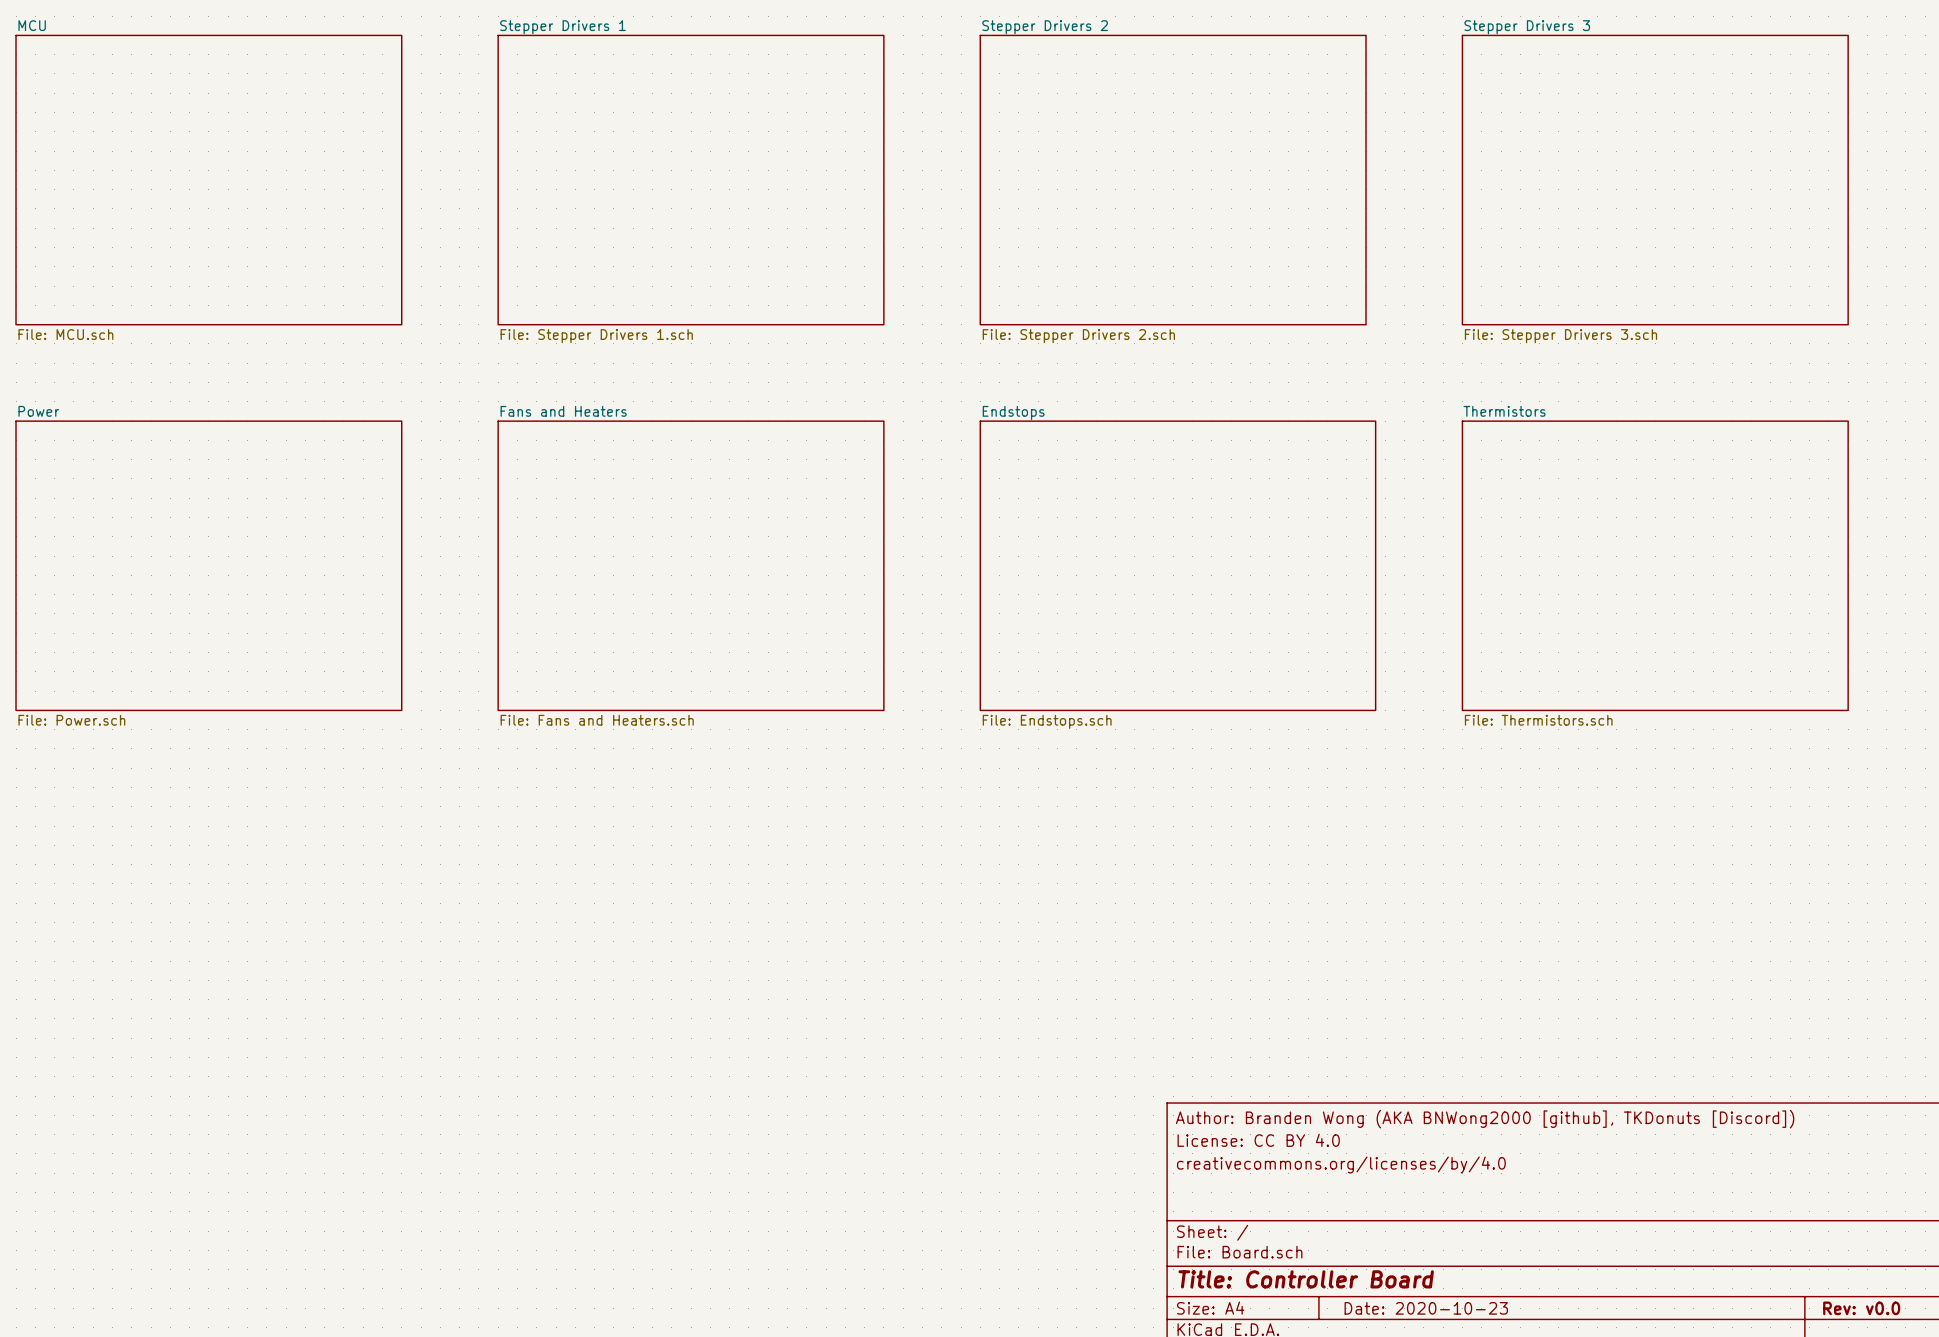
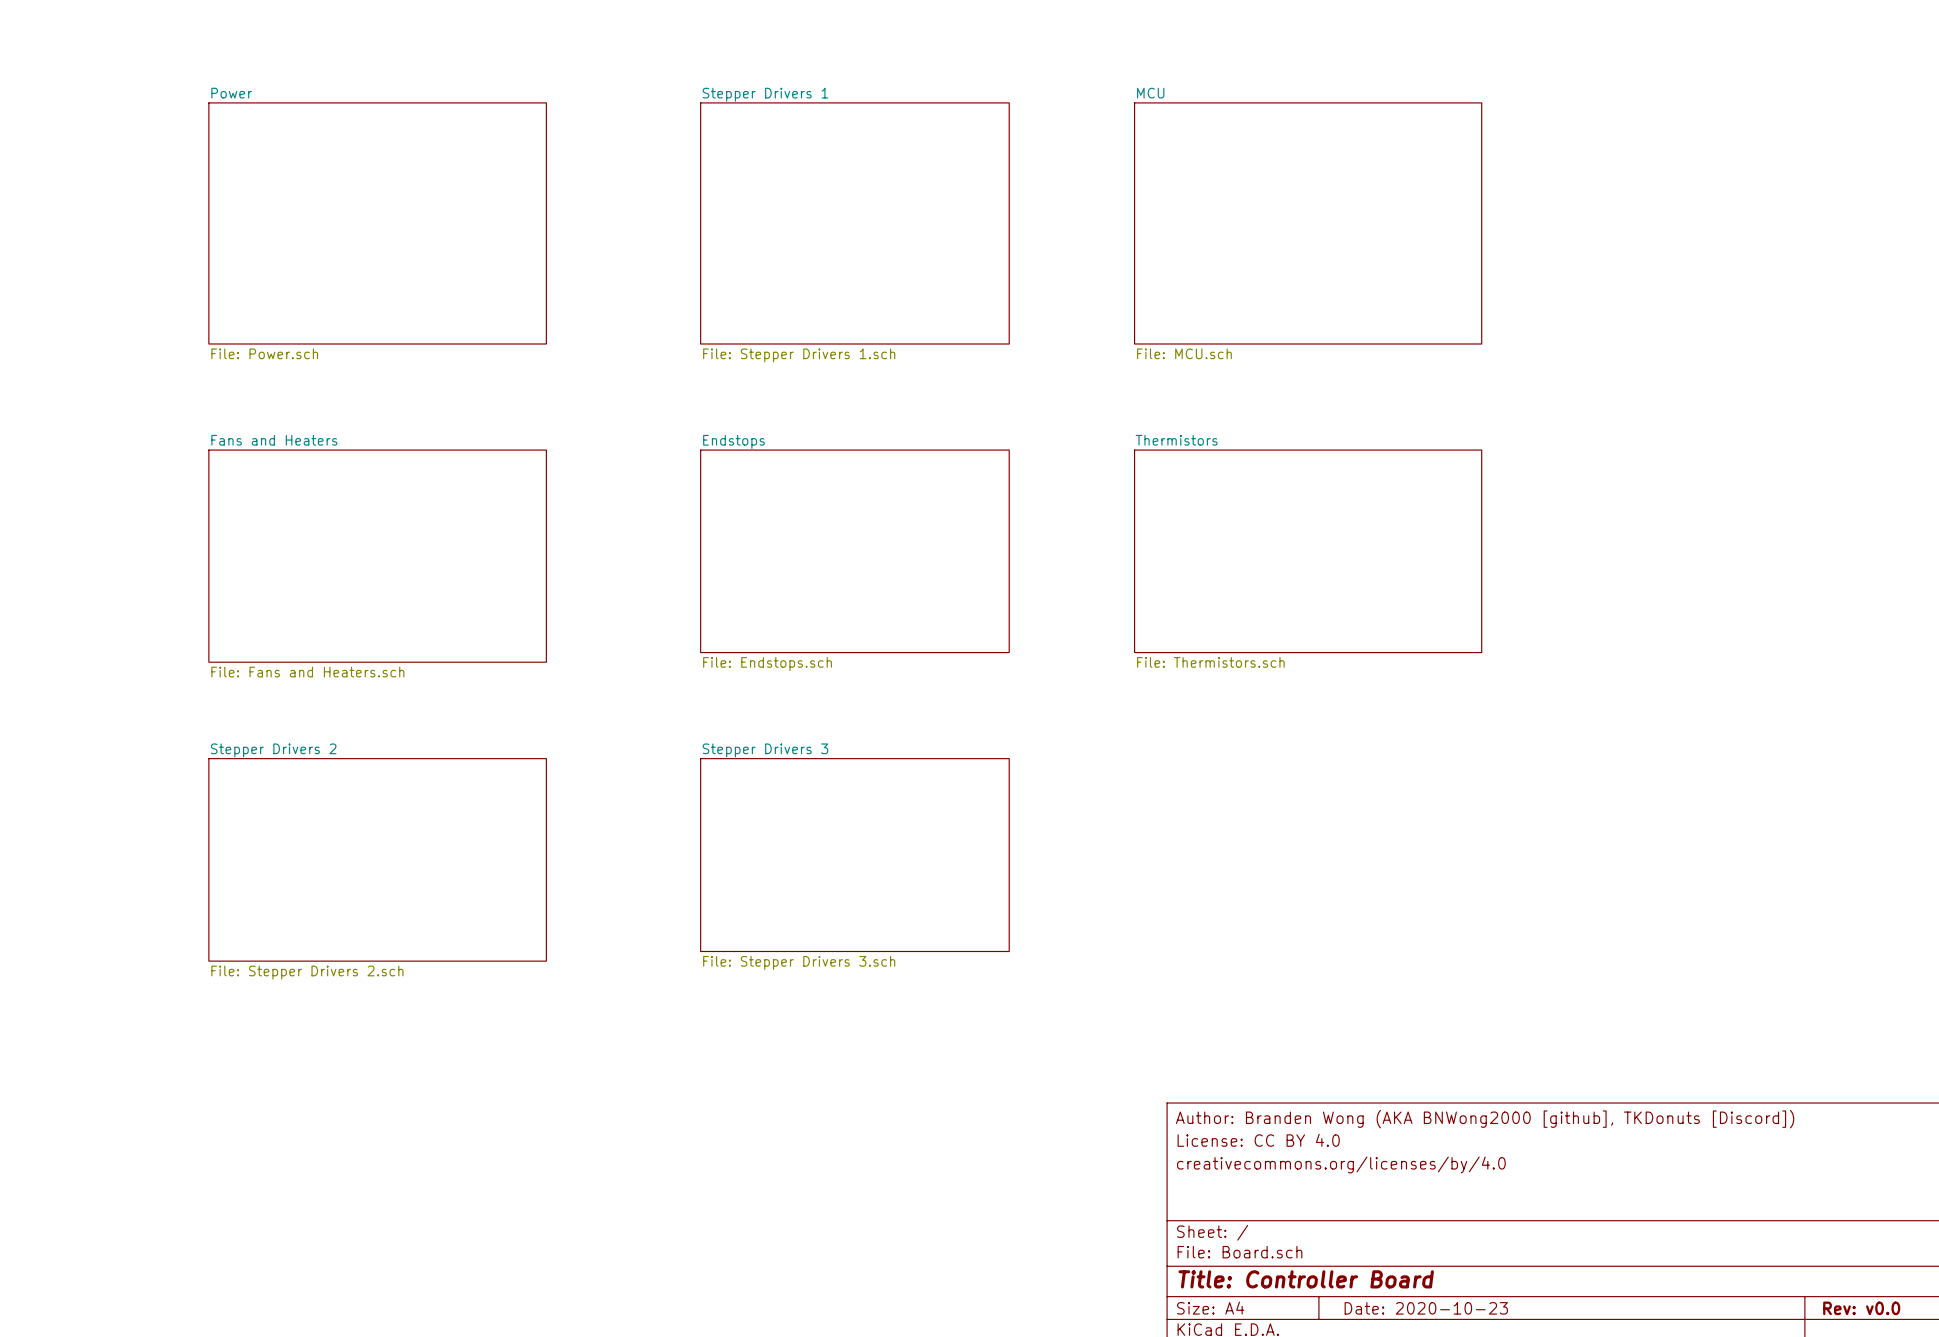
sheet Stepper Drivers 1 name position: Stepper Drivers 1 (562, 27) -> Stepper Drivers 1 (765, 94)
sheet Stepper Drivers 2 name position: Stepper Drivers 2 (1045, 27) -> Stepper Drivers 2 (273, 750)
sheet Stepper Drivers 3 name position: Stepper Drivers 3 (1527, 27) -> Stepper Drivers 3 (765, 750)
sheet Stepper Drivers 1 shape: [498, 35, 884, 325] -> [700, 102, 1010, 344]
sheet Stepper Drivers 2 shape: [980, 35, 1367, 325] -> [208, 758, 547, 962]
sheet Stepper Drivers 3 shape: [1462, 35, 1849, 325] -> [700, 758, 1010, 952]
sheet MCU: File: MCU.sch (208, 180) -> none
sheet Power: none -> File: Power.sch (377, 223)
sheet MCU: none -> File: MCU.sch (1308, 223)
sheet Stepper Drivers 1 value position: File: Stepper Drivers 1.sch (596, 336) -> File: Stepper Drivers 1.sch (799, 355)
sheet Stepper Drivers 2 value position: File: Stepper Drivers 2.sch (1078, 336) -> File: Stepper Drivers 2.sch (307, 972)
sheet Stepper Drivers 3 value position: File: Stepper Drivers 3.sch (1560, 336) -> File: Stepper Drivers 3.sch (799, 962)
sheet Endstops: none -> File: Endstops.sch (854, 551)
sheet Thermistors: none -> File: Thermistors.sch (1308, 551)
sheet Fans and Heaters: none -> File: Fans and Heaters.sch (377, 556)
sheet Power: File: Power.sch (208, 565) -> none
sheet Fans and Heaters: File: Fans and Heaters.sch (691, 565) -> none
sheet Endstops: File: Endstops.sch (1177, 565) -> none
sheet Thermistors: File: Thermistors.sch (1655, 565) -> none

